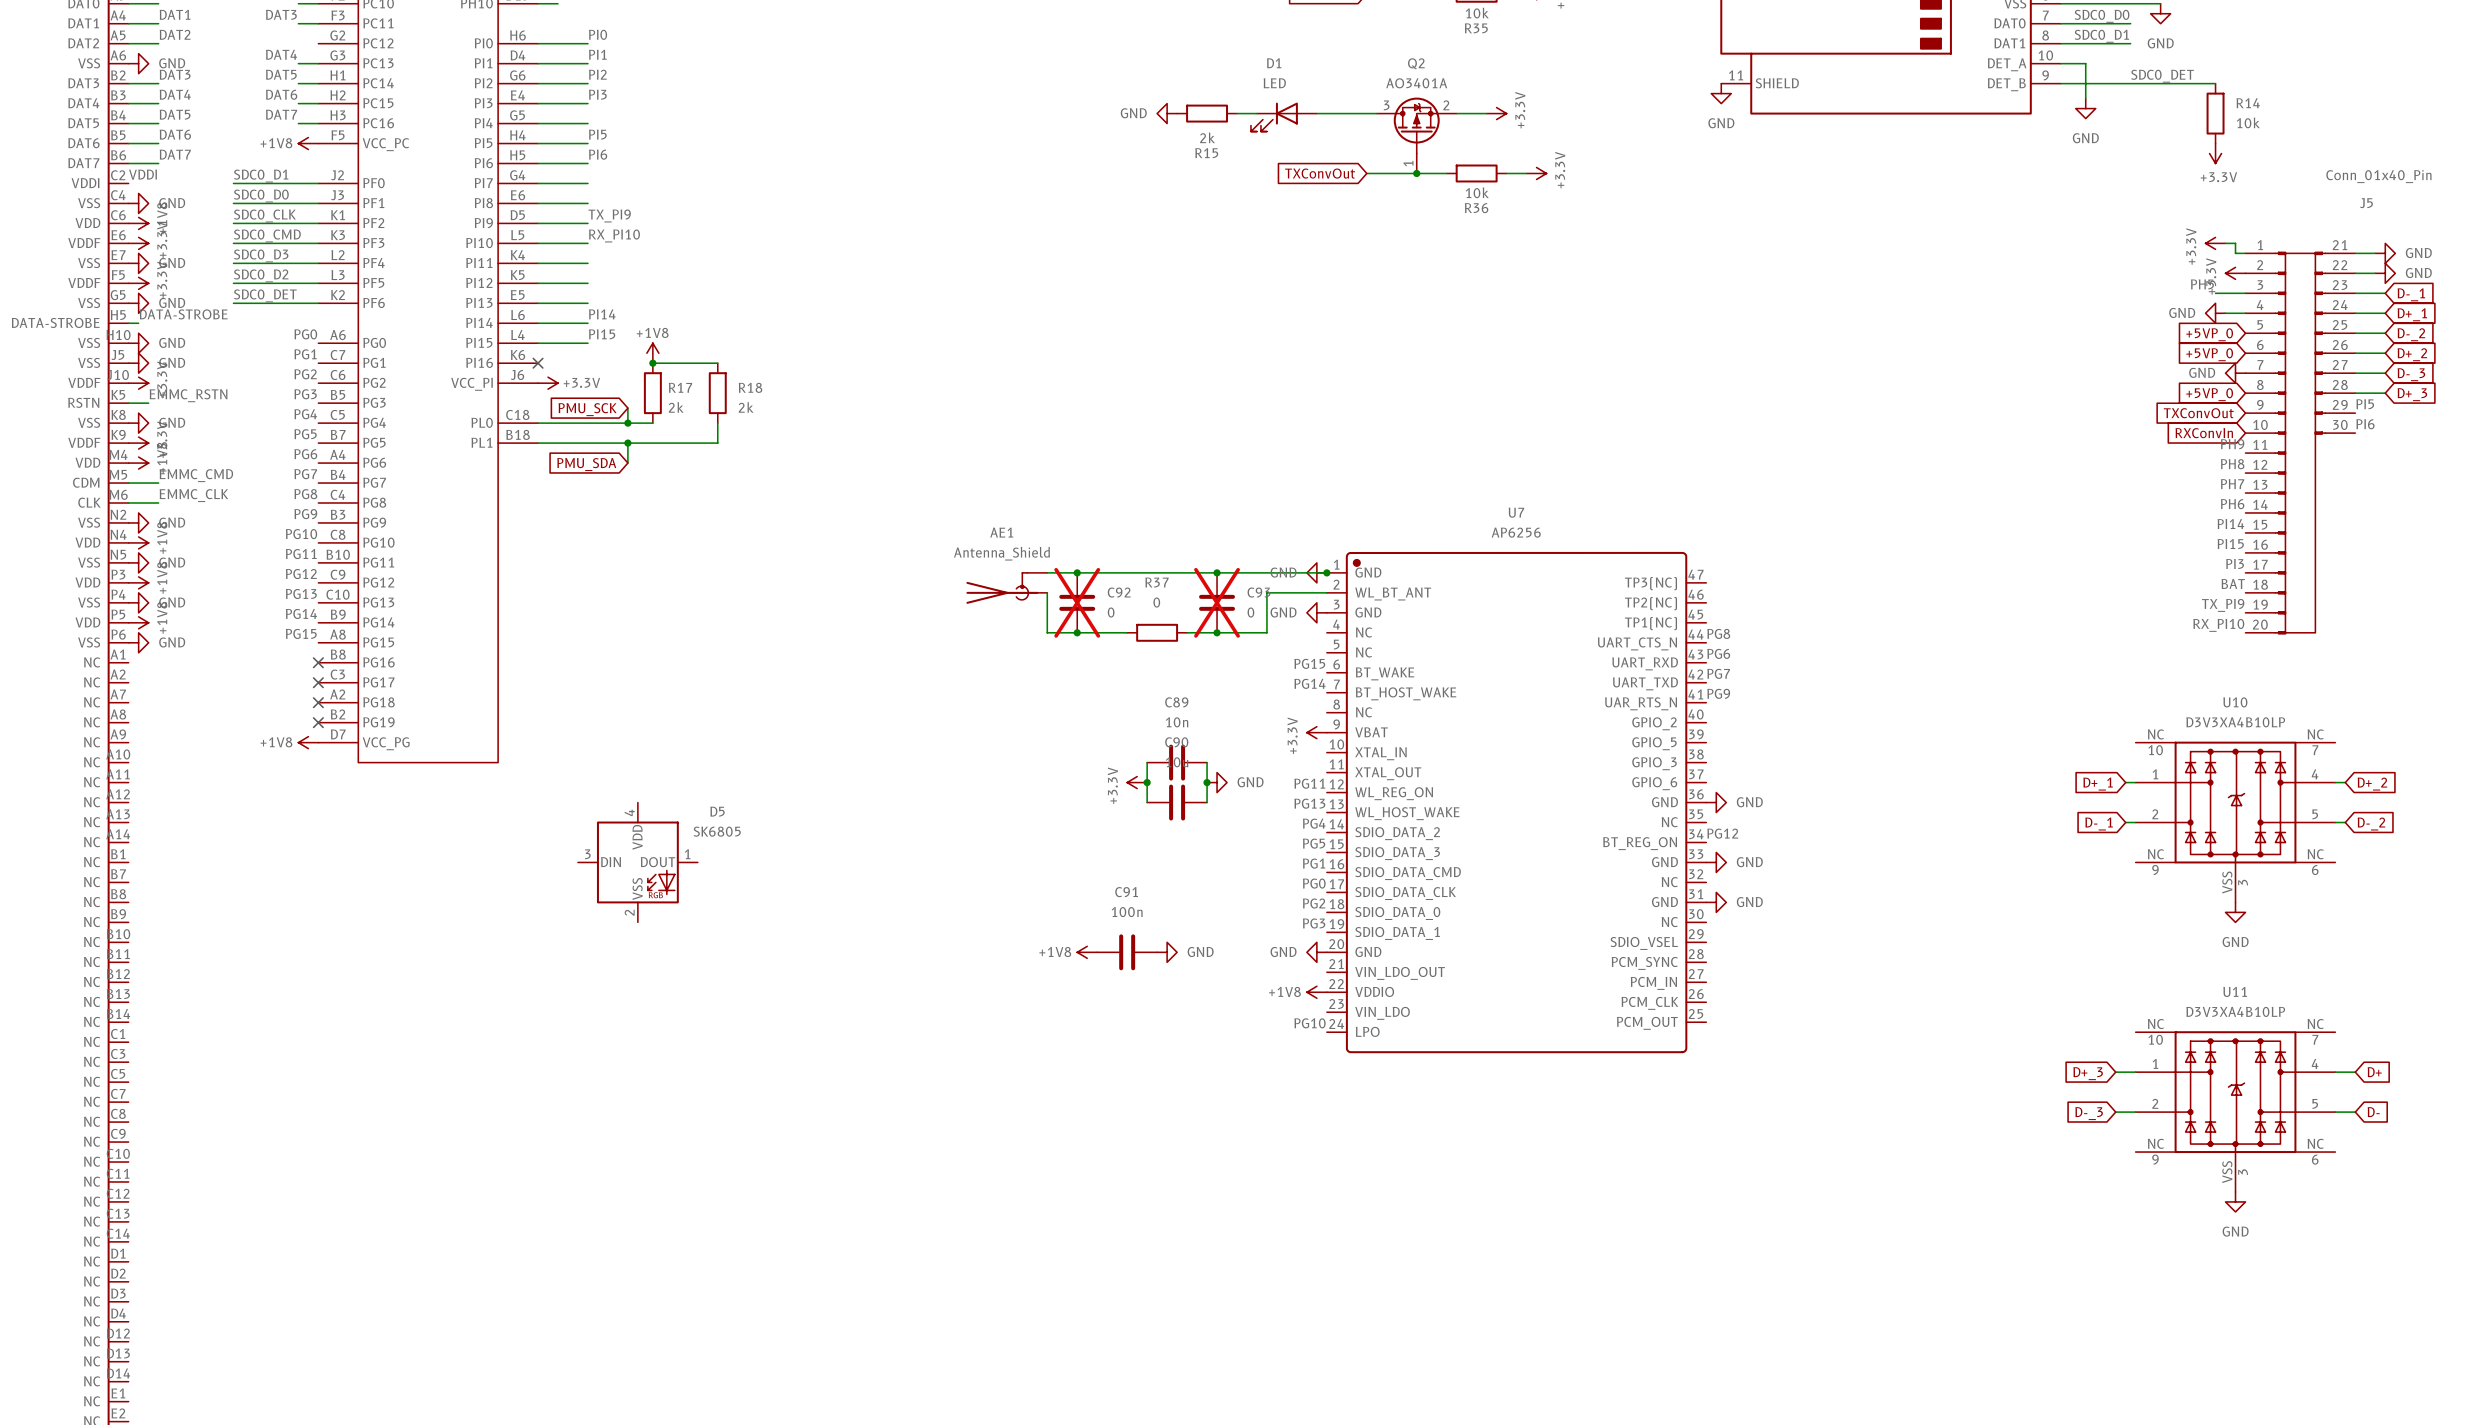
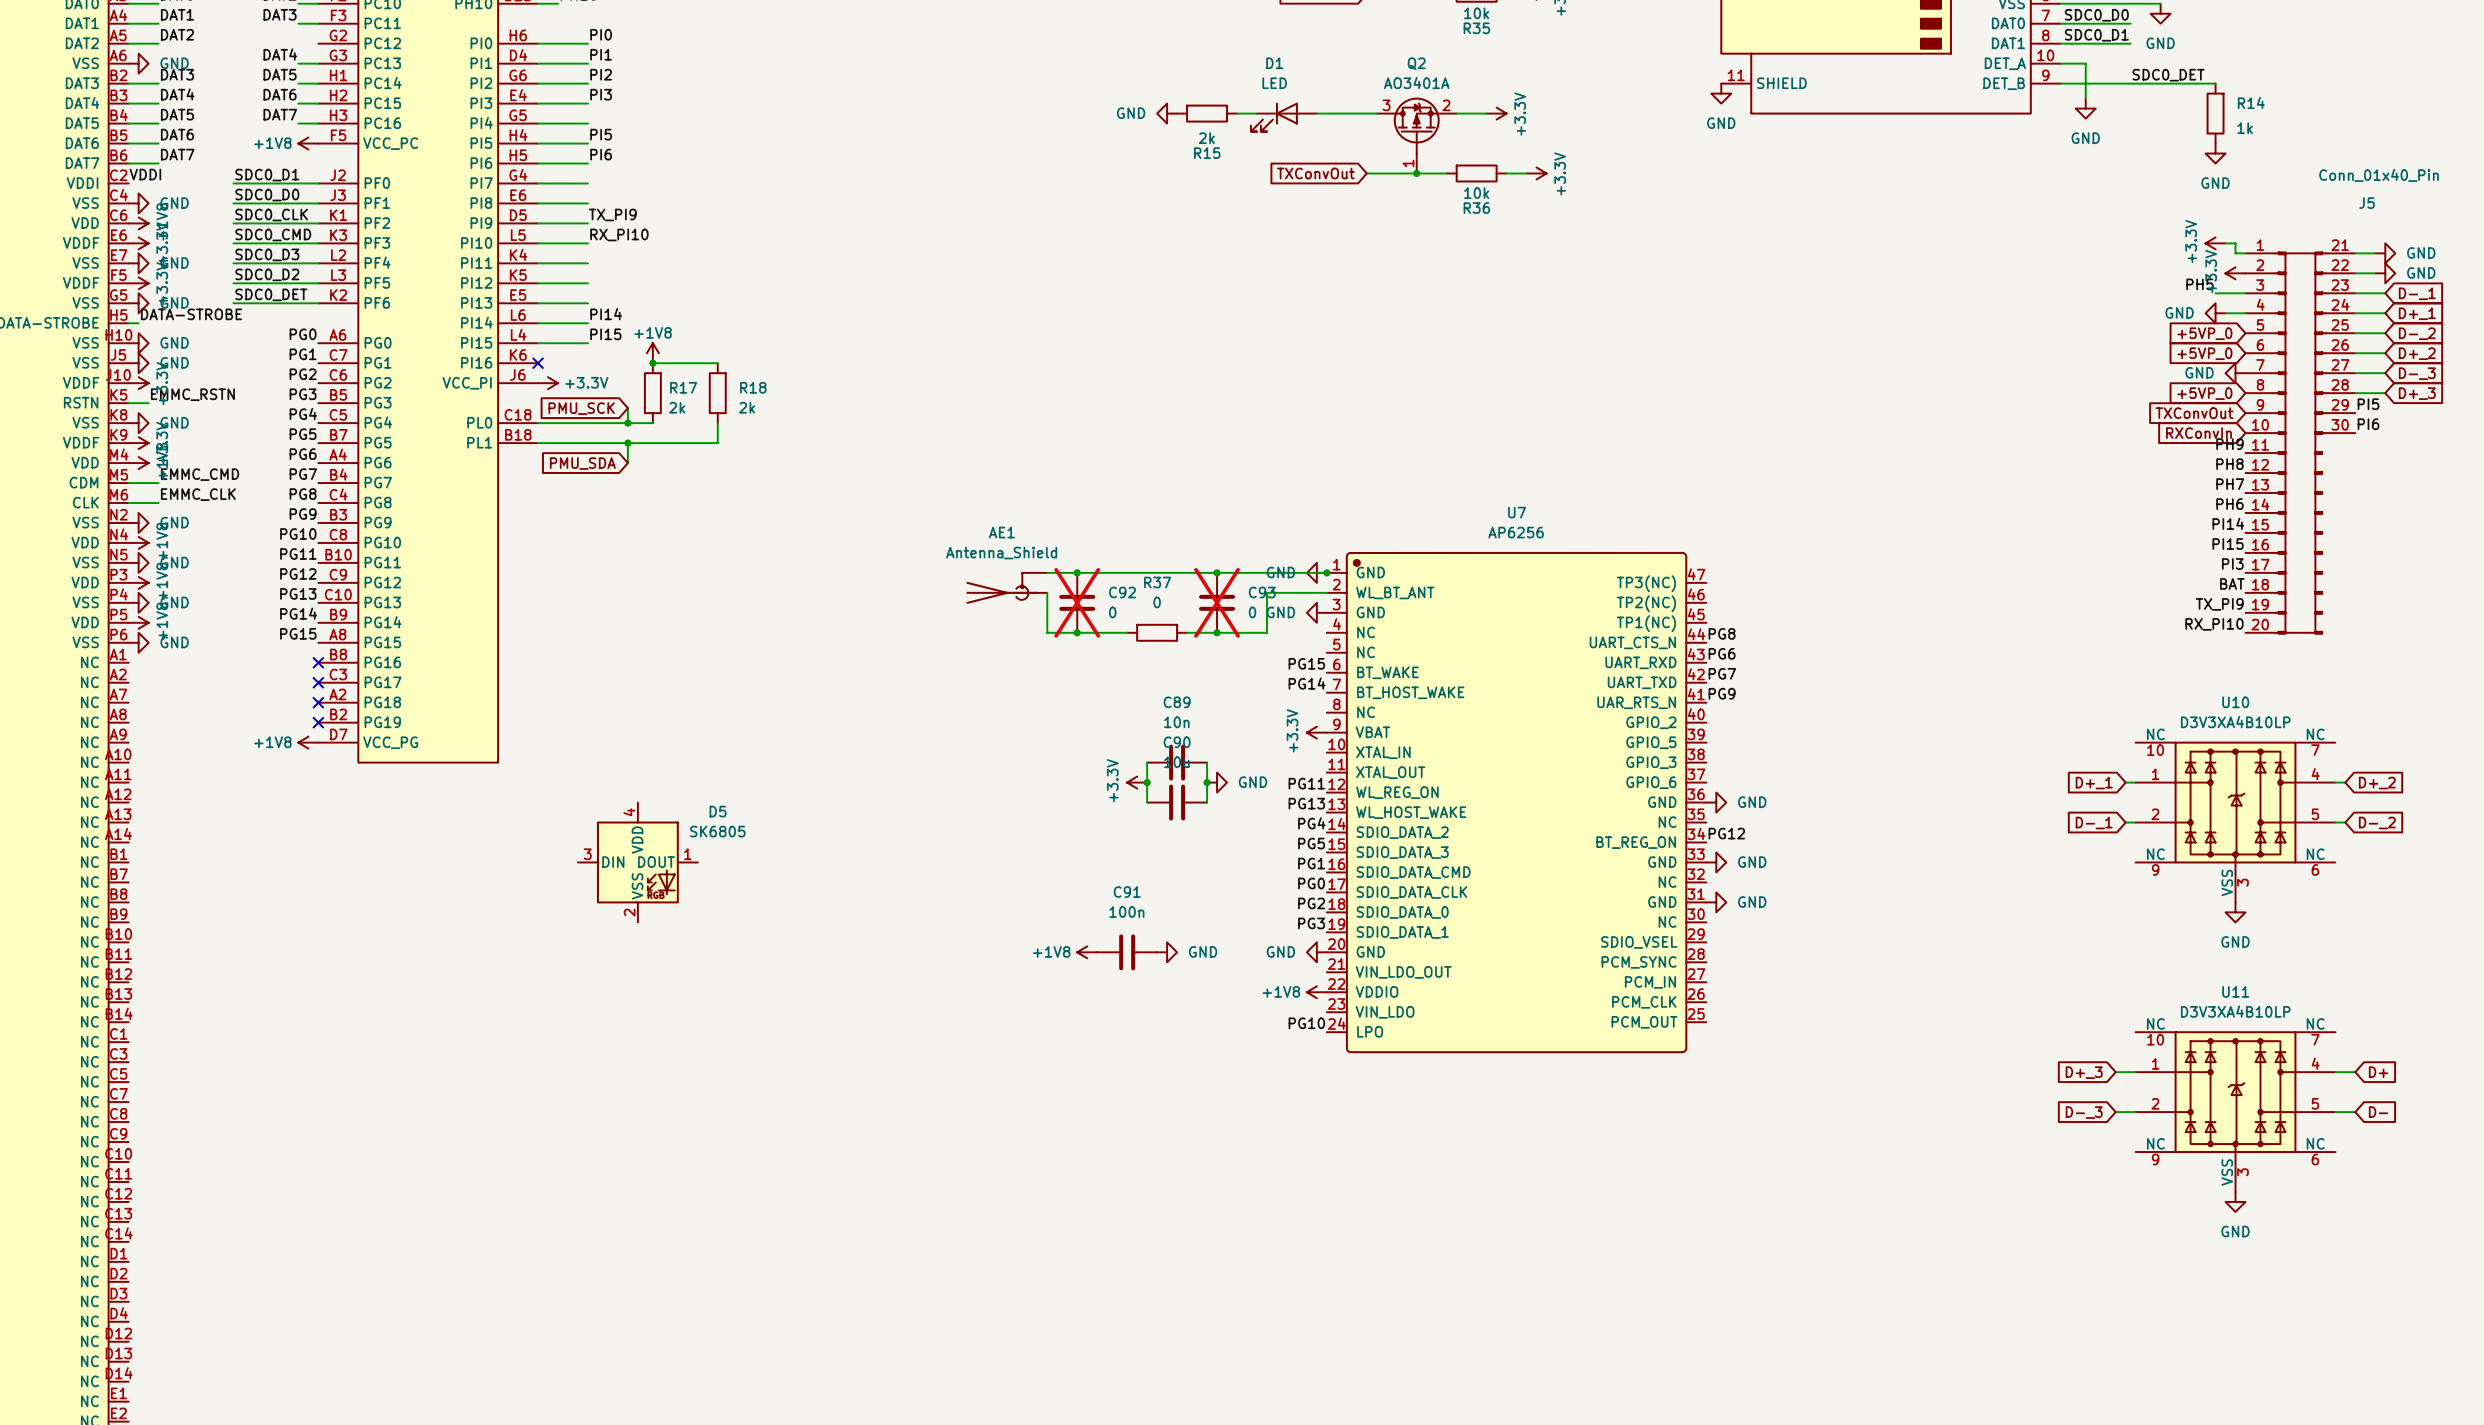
R14 value: 10k (2248, 122) -> 1k (2245, 128)
power symbol: +3.3V (2215, 153) -> GND (2215, 153)
J5 symbol: [2245, 251, 2356, 635] -> [2245, 251, 2356, 635]

